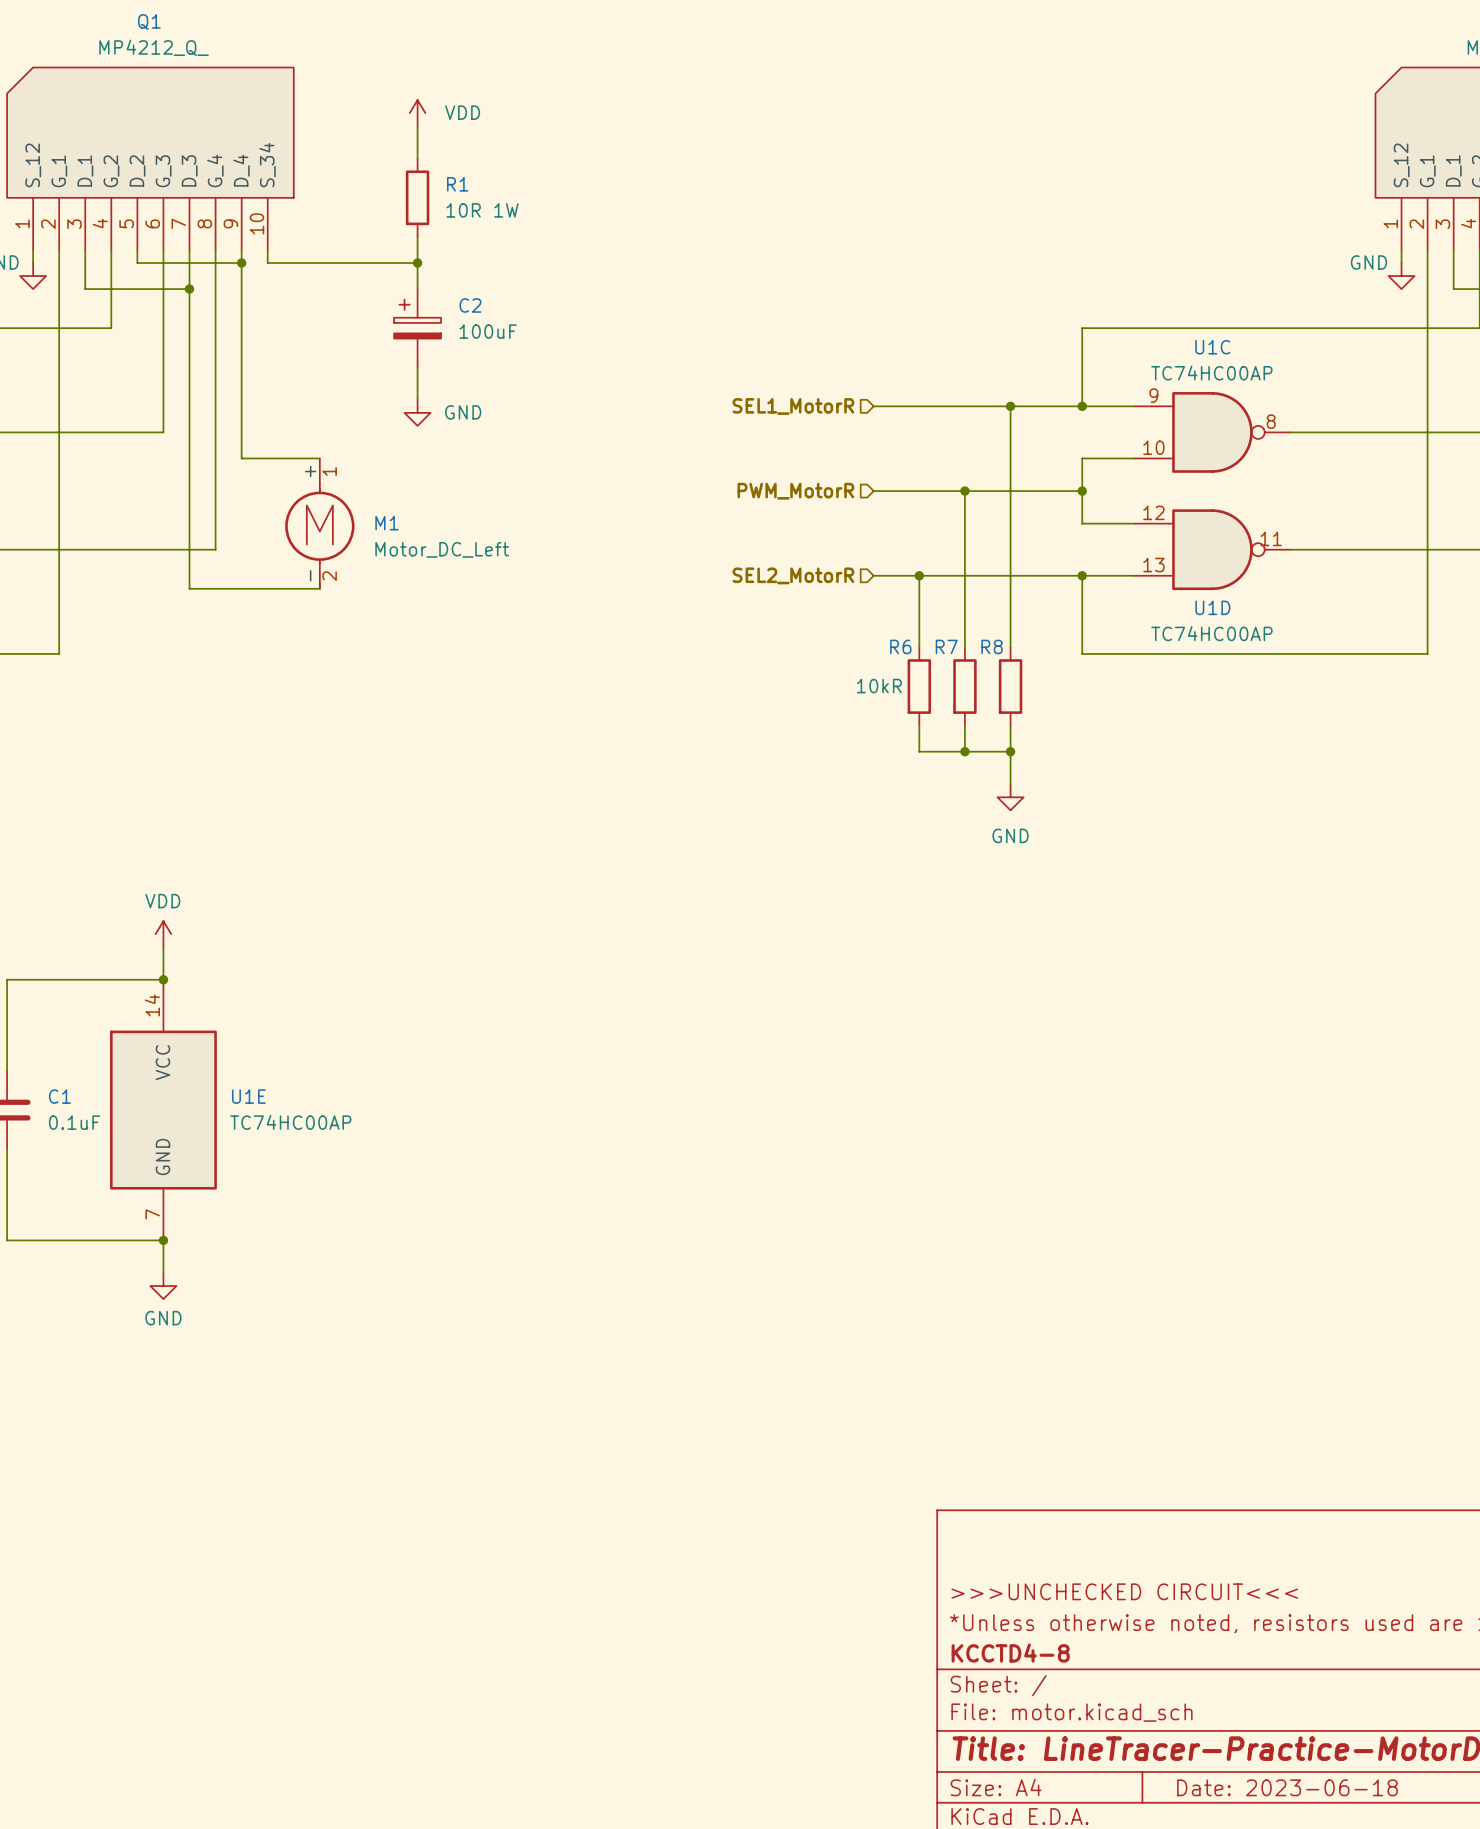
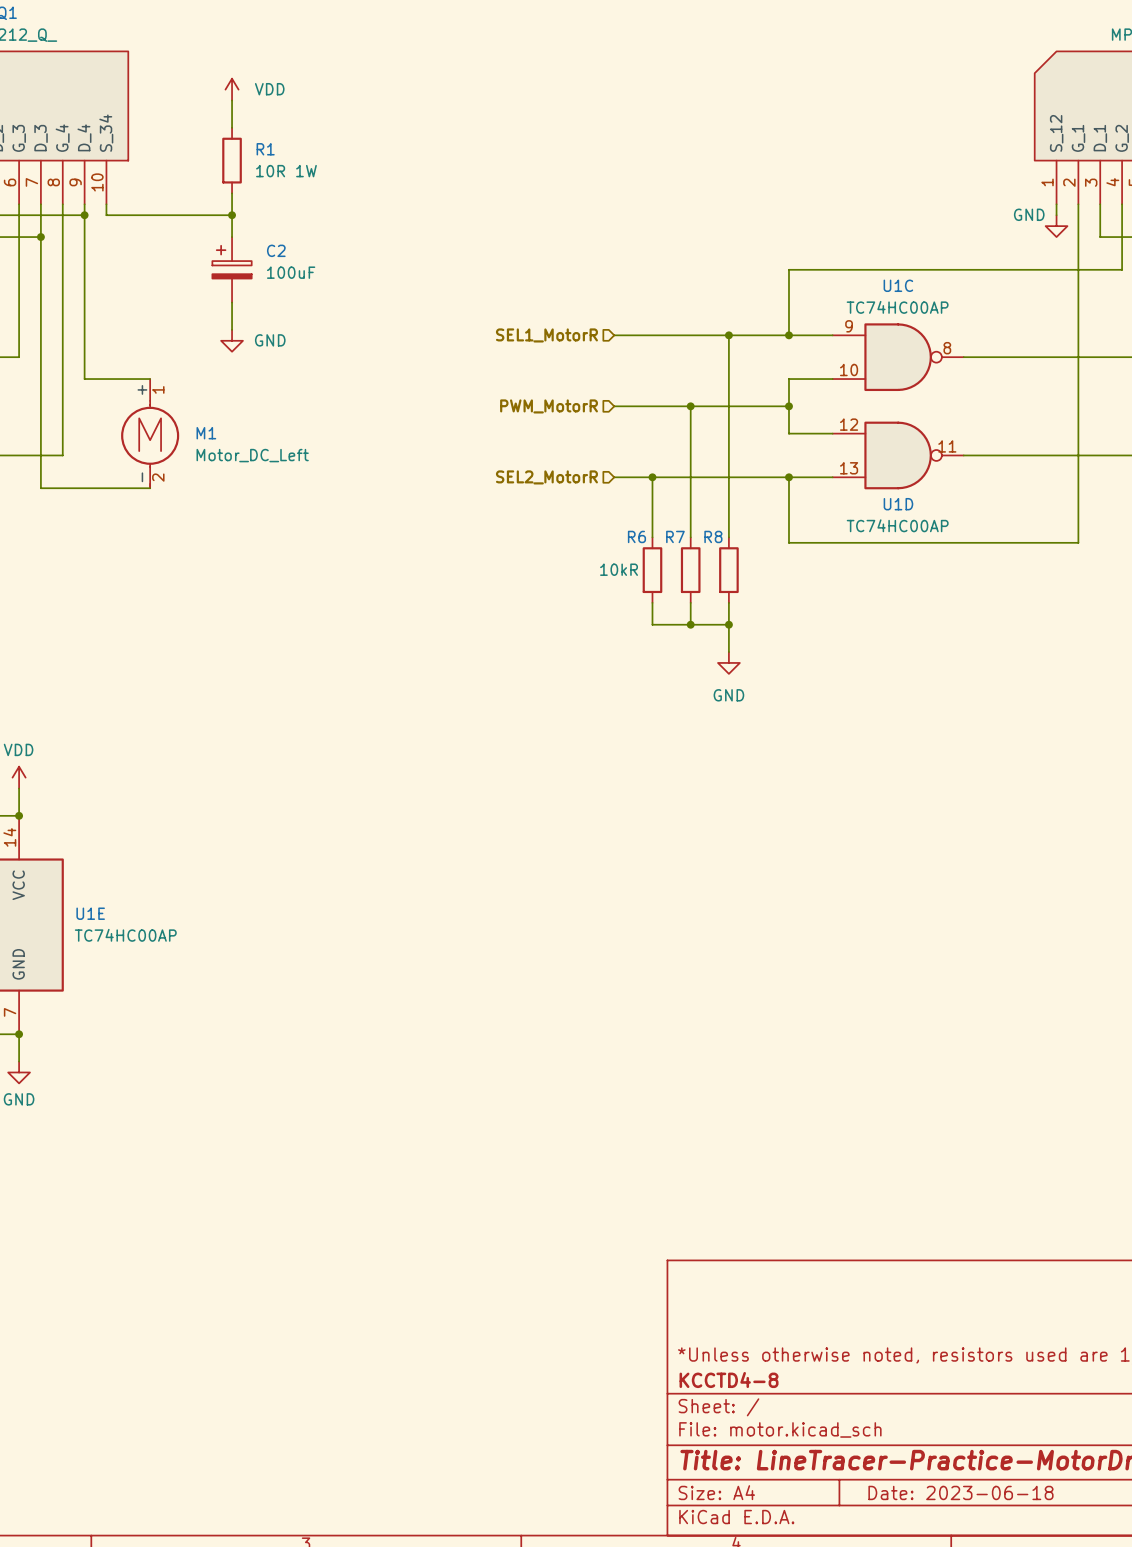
title block: >>>UNCHECKED CIRCUIT<<< (1124, 1591) -> none

